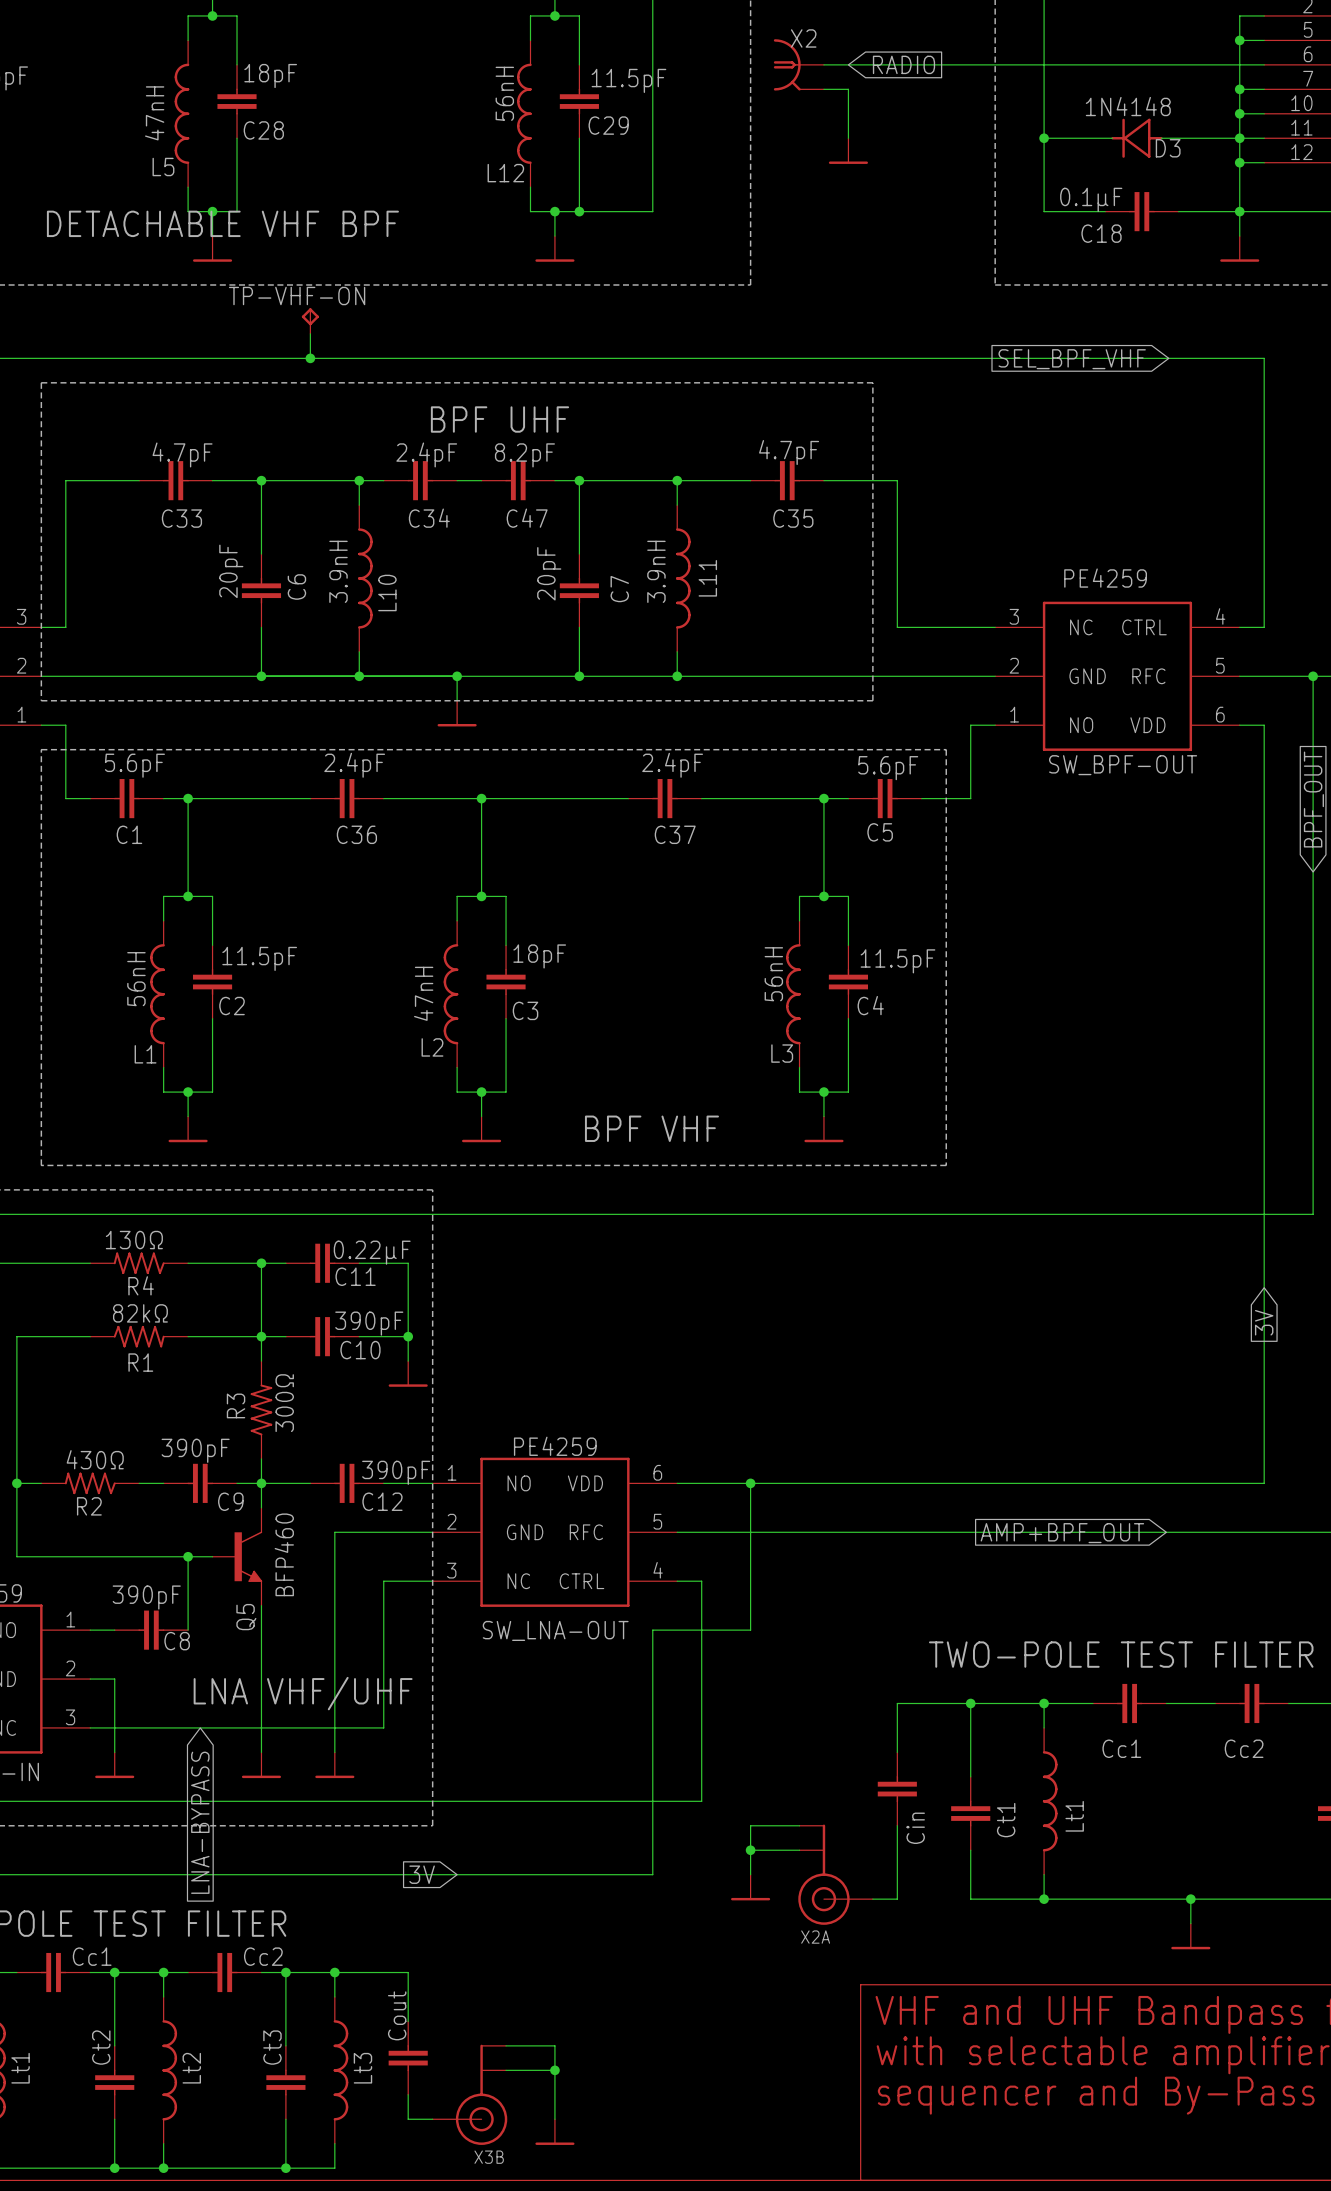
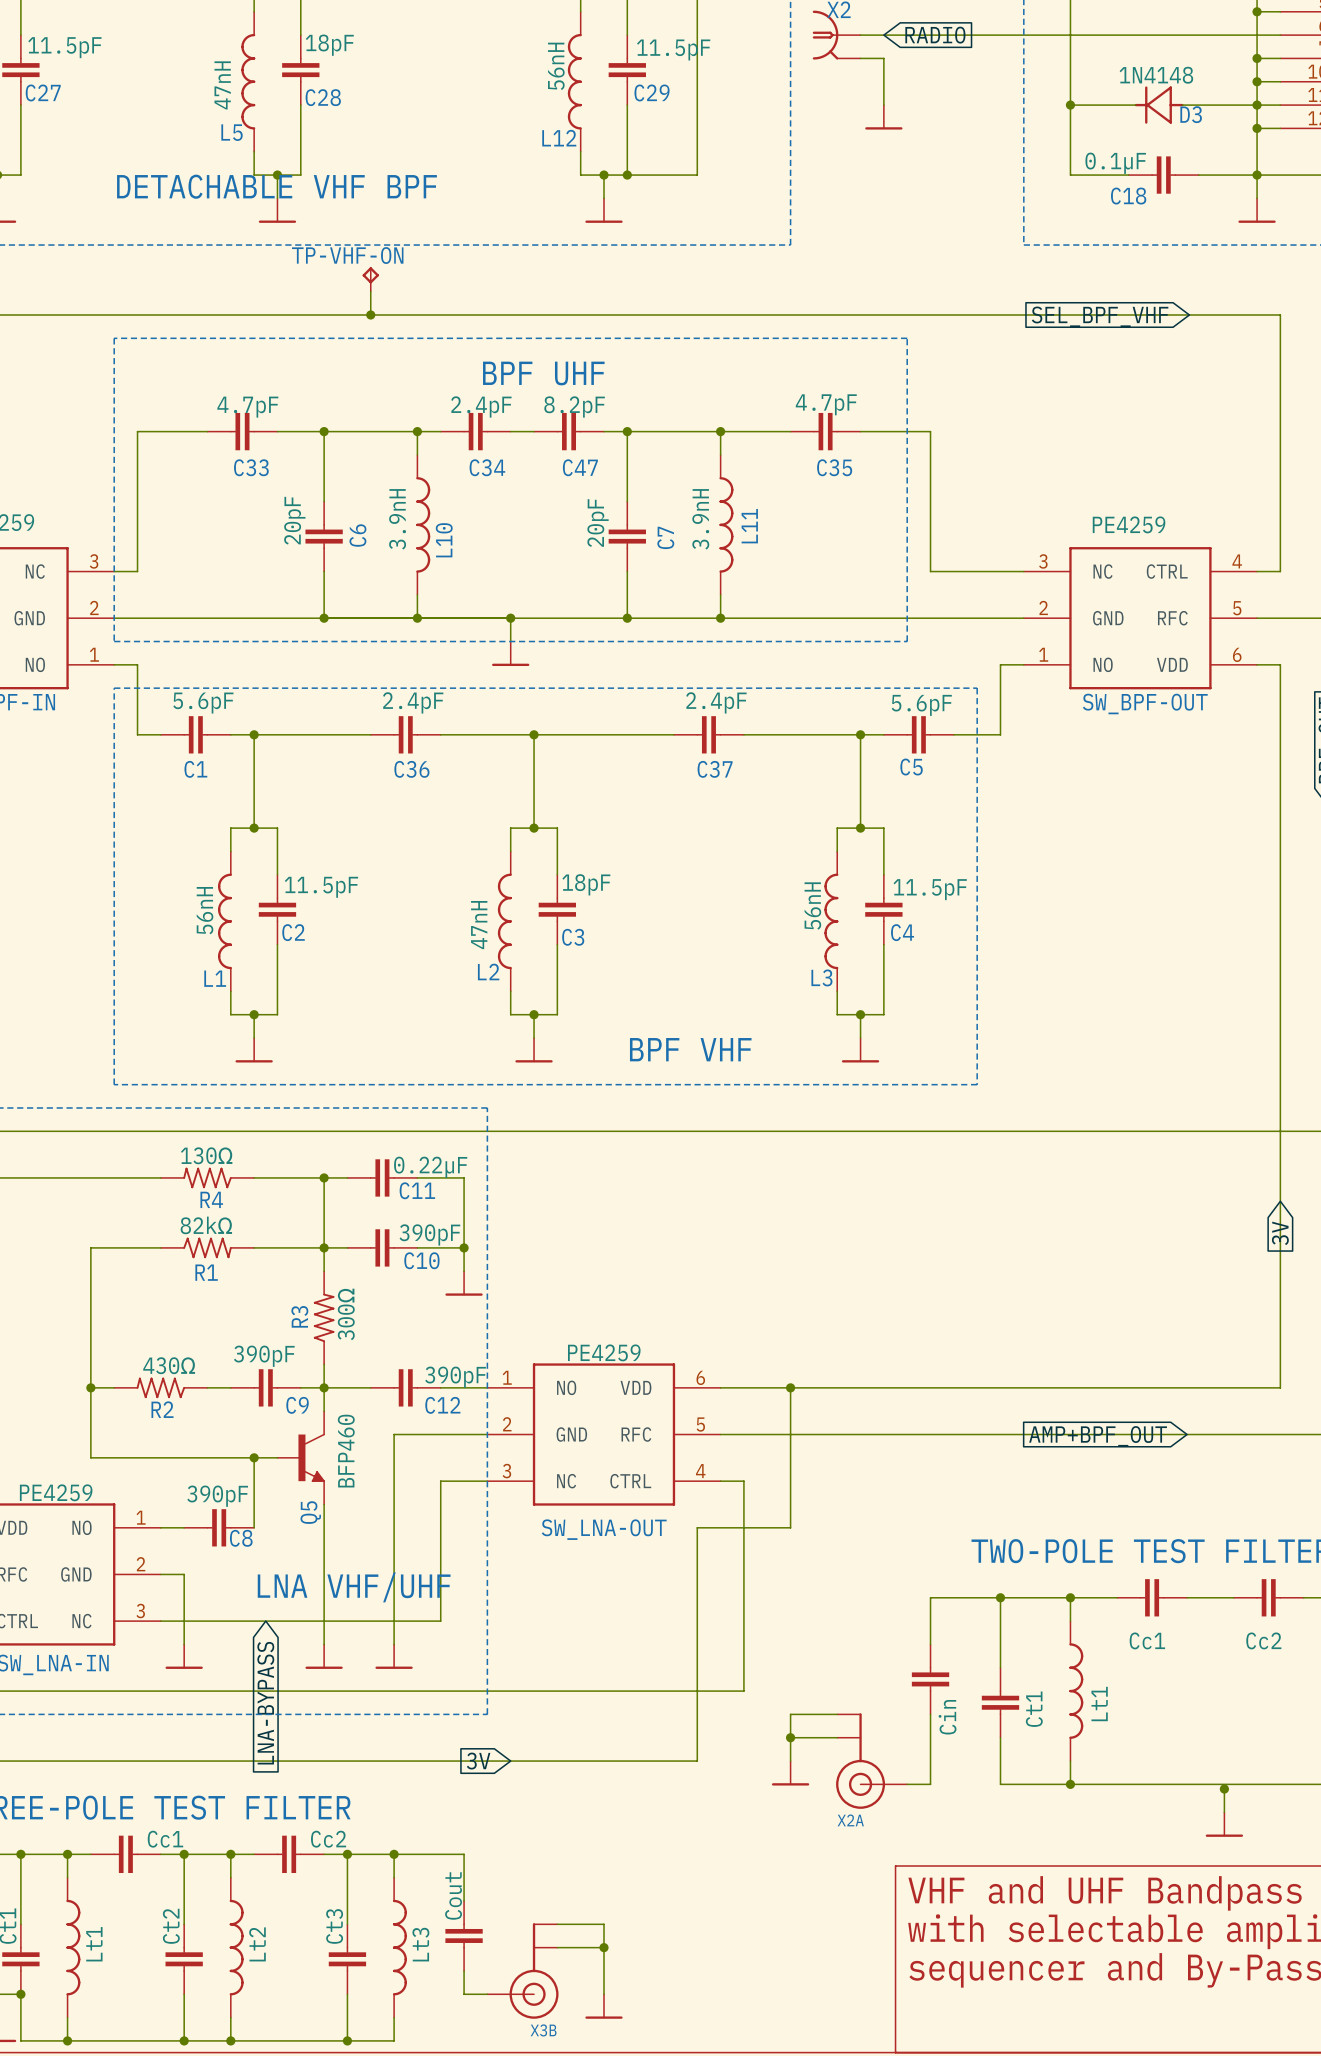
wire: (1190, 1899) (1190, 1923) -> (1224, 1789) (1224, 1812)
junction position: (1190, 1899) -> (1224, 1789)
power symbol position: (1190, 1936) -> (1224, 1824)

